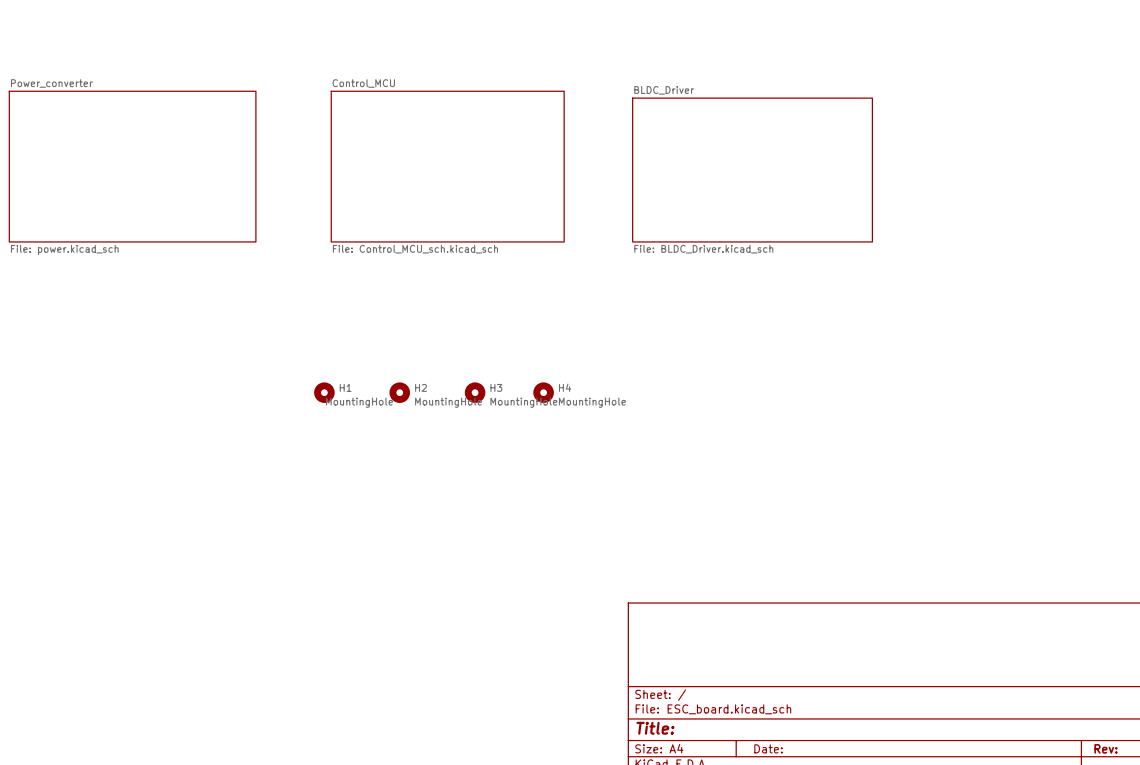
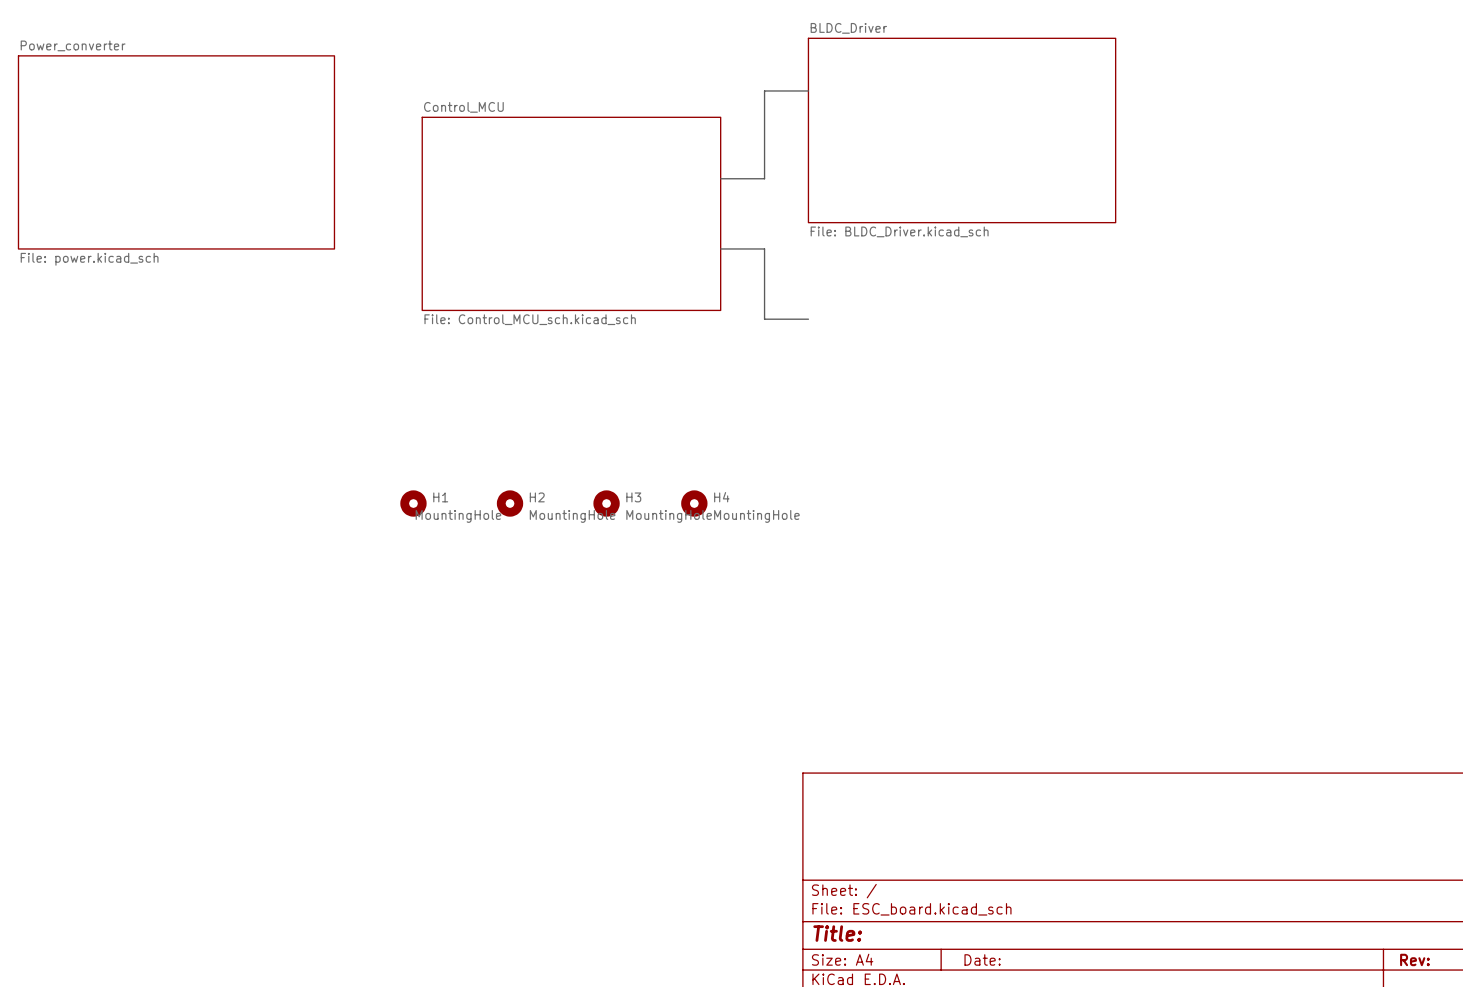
bus: none -> (808, 90) (764, 90) (764, 178) (720, 178)
sheet Power_converter position: (132, 166) -> (176, 152)
sheet BLDC_Driver position: (752, 170) -> (962, 130)
bus: none -> (720, 248) (764, 248) (764, 319) (808, 319)

